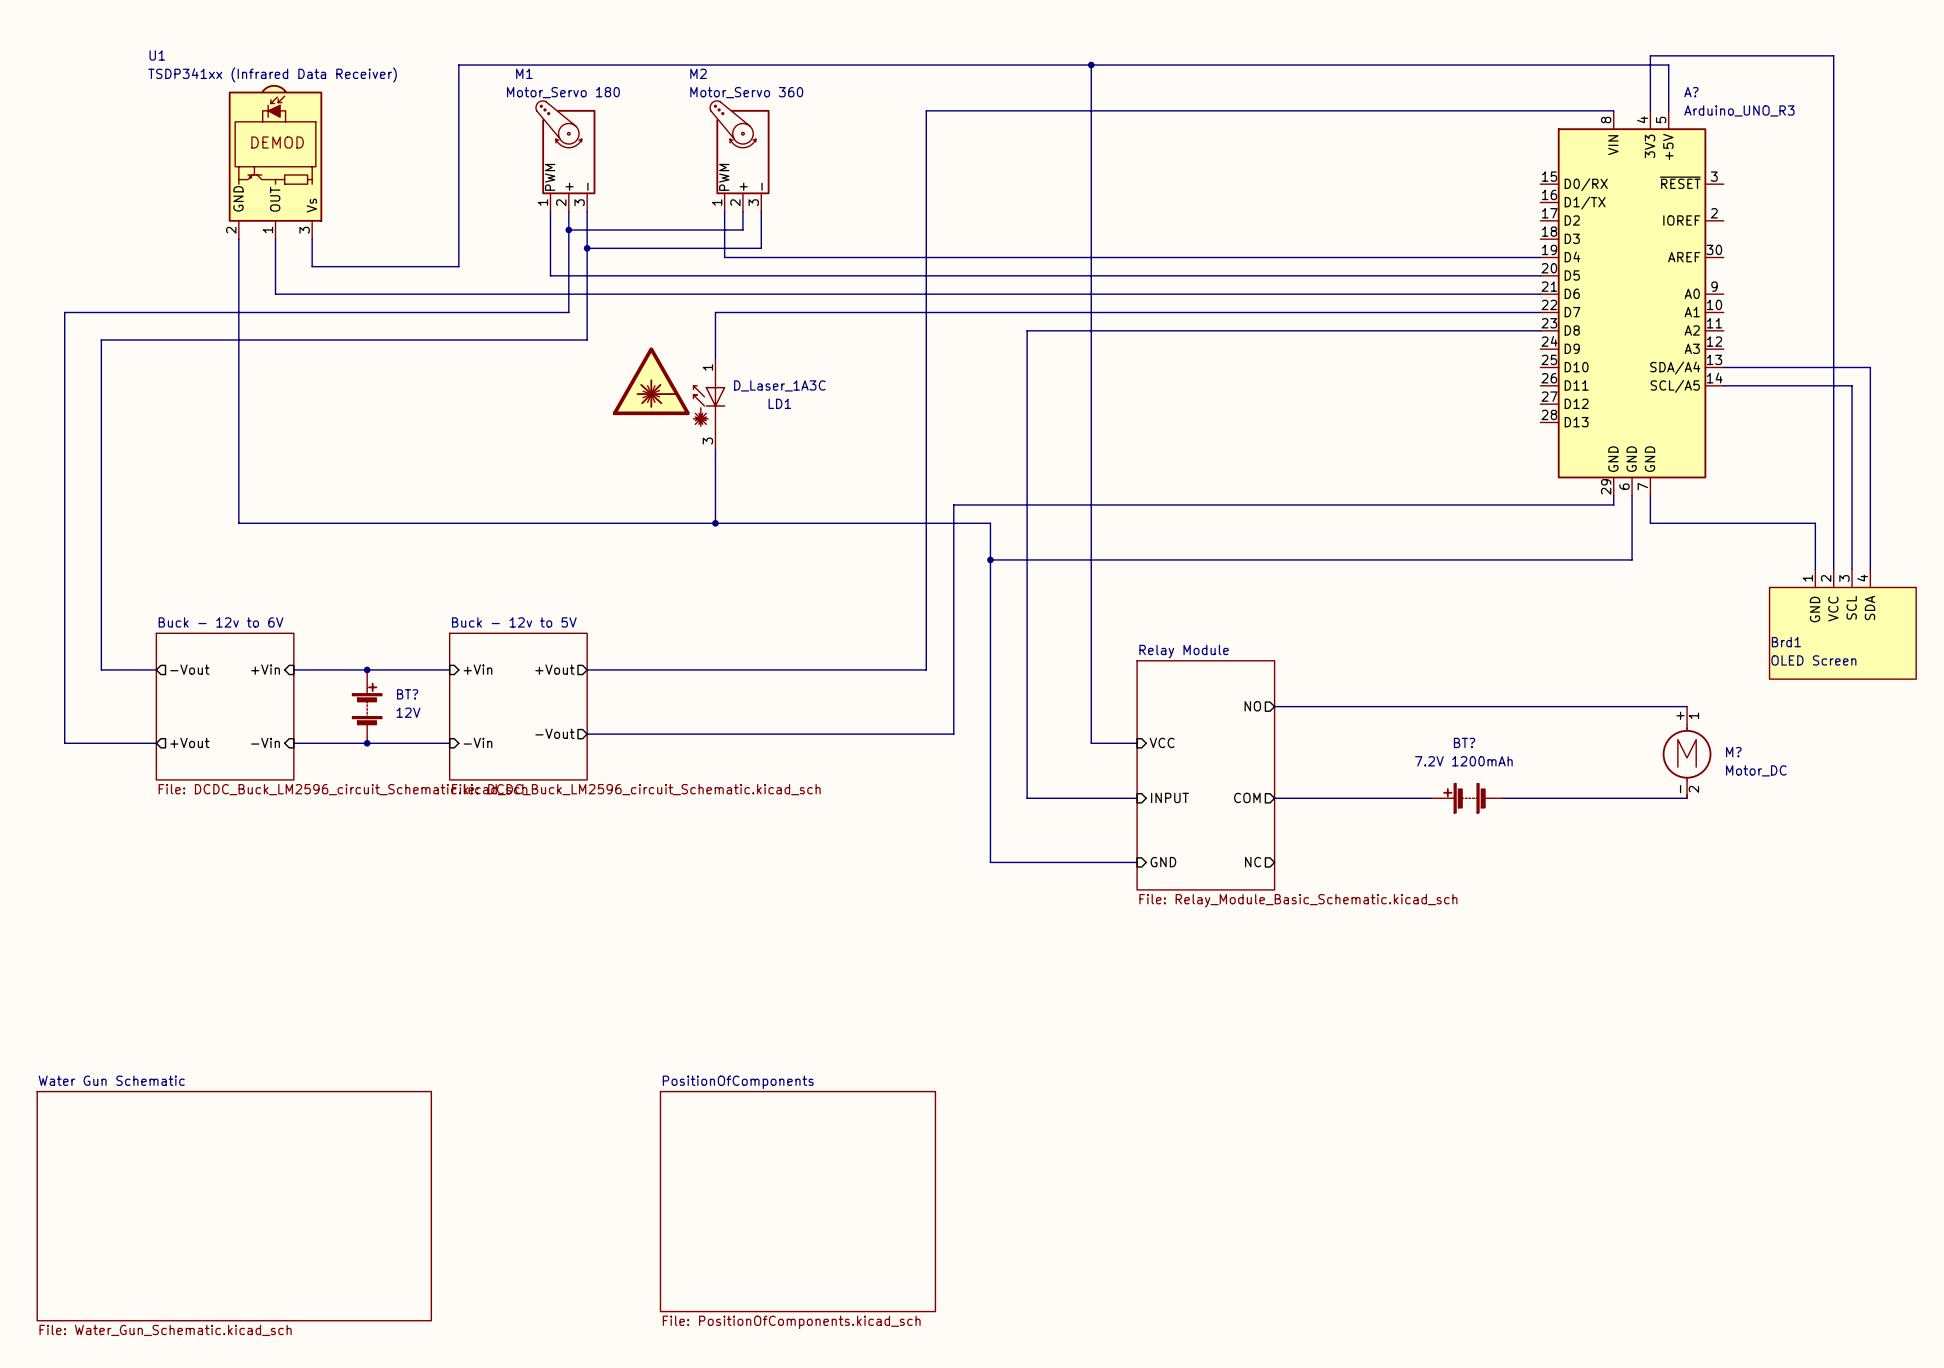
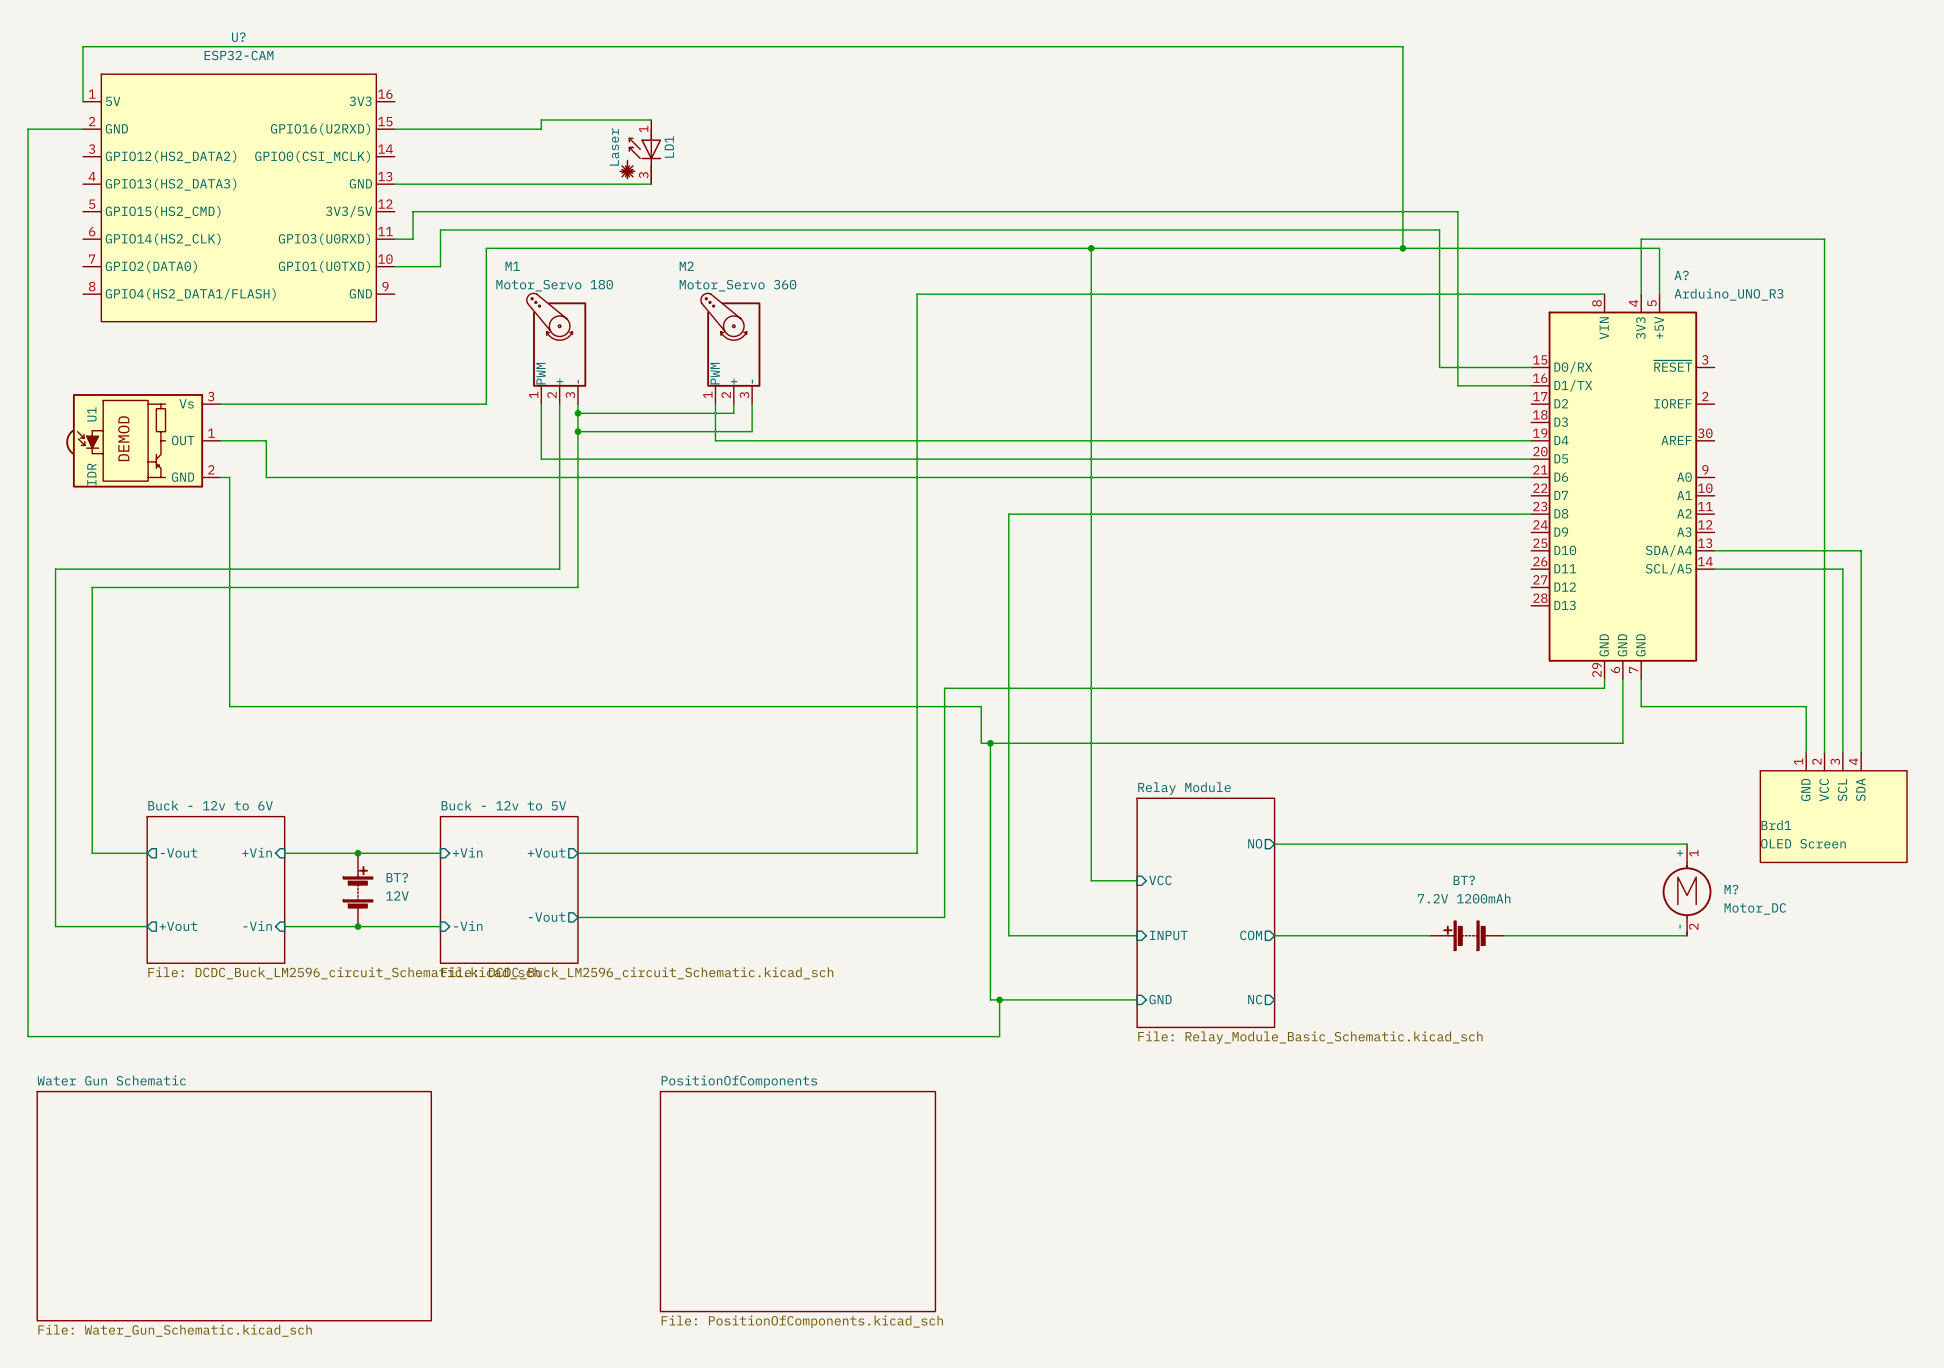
U1 name position: U1 (157, 55) -> U1 (91, 414)
wire: (1091, 65) (1091, 248) -> none
junction: (1091, 65) -> none
U1 value: TSDP341xx (Infrared Data Receiver) (272, 74) -> IDR (91, 474)
wire: none -> (83, 101) (83, 46) (1402, 46) (1402, 248)
wire: (1613, 110) (926, 110) (926, 669) (587, 669) -> none
wire: (1650, 110) (1650, 55) (1833, 55) (1833, 569) -> none
wire: (1668, 110) (1668, 65) (458, 65) (458, 266) (440, 266) -> (568, 230) (440, 230) (440, 266)
wire: none -> (651, 120) (541, 120) (541, 129) (394, 129)
wire: none -> (83, 129) (28, 129) (28, 1036) (999, 1036) (999, 999)
U1 rotation: 0° (275, 153) -> 90° counterclockwise (134, 440)
M1 position: (565, 156) -> (556, 348)
M2 position: (739, 156) -> (730, 348)
U1 position: (275, 162) -> (143, 440)
wire: none -> (394, 184) (651, 184)
U?: none -> ESP32-CAM (238, 197)
wire: (550, 211) (550, 275) (1540, 275) -> none
wire: (568, 211) (568, 312) (64, 312) (64, 743) (156, 743) -> none
wire: (587, 211) (587, 339) (101, 339) (101, 669) (156, 669) -> none
wire: (724, 211) (724, 257) (1540, 257) -> none
wire: (742, 211) (742, 230) -> (1531, 367) (1439, 367) (1439, 230) (742, 230)
wire: (761, 211) (761, 248) -> (1659, 294) (1659, 248) (761, 248)
junction: (568, 230) -> none
wire: (238, 239) (238, 523) (990, 523) (990, 743) -> none
wire: (275, 239) (275, 294) (917, 294) -> (577, 853) (917, 853) (917, 294)
wire: none -> (394, 239) (412, 239) (412, 211) (1457, 211) (1457, 385) (1531, 385)
wire: none -> (587, 248) (486, 248) (486, 404) (220, 404)
junction: (587, 248) -> none
junction: none -> (1091, 248)
junction: none -> (1402, 248)
wire: none -> (1641, 294) (1641, 239) (1824, 239) (1824, 752)
A?: Arduino_UNO_R3 (1632, 303) -> none
wire: (1540, 312) (715, 312) (715, 358) -> none
wire: (1540, 330) (1027, 330) (1027, 798) (1137, 798) -> none
LD1 symbol: [693, 358, 726, 450] -> [620, 120, 662, 185]
wire: (1723, 367) (1870, 367) (1870, 569) -> none
power symbol: (651, 381) -> none
LD1 value: D_Laser_1A3C (779, 385) -> Laser (614, 146)
wire: (1723, 385) (1852, 385) (1852, 569) -> none
LD1 name position: LD1 (779, 403) -> LD1 (669, 147)
wire: none -> (541, 404) (541, 459) (1531, 459)
wire: none -> (559, 404) (559, 569) (55, 569) (55, 926) (147, 926)
wire: none -> (577, 404) (577, 587) (92, 587) (92, 853) (147, 853)
wire: none -> (715, 404) (715, 440) (1531, 440)
wire: none -> (733, 404) (733, 413) (577, 413)
wire: none -> (752, 404) (752, 431) (577, 431)
junction: none -> (577, 413)
junction: none -> (577, 431)
wire: none -> (220, 440) (266, 440) (266, 477) (1531, 477)
wire: (715, 449) (715, 523) -> none
wire: none -> (220, 477) (229, 477) (229, 706) (981, 706) (981, 743) (1091, 743) (1091, 880) (1137, 880)
A?: none -> Arduino_UNO_R3 (1622, 486)
wire: (1613, 495) (1613, 504) (953, 504) (953, 734) (587, 734) -> none
wire: (1632, 495) (1632, 559) (990, 559) -> none
wire: (1650, 495) (1650, 523) (1815, 523) (1815, 569) -> none
wire: none -> (1531, 514) (1008, 514) (1008, 935) (1137, 935)
junction: (715, 523) -> none
wire: none -> (1714, 550) (1861, 550) (1861, 752)
junction: (990, 559) -> none
wire: none -> (1714, 569) (1842, 569) (1842, 752)
Brd1 position: (1842, 624) -> (1833, 807)
sheet pin: -Vout (189, 669) -> none
sheet pin: +Vin (265, 669) -> none
wire: (293, 669) (449, 669) -> none
junction: (367, 669) -> none
sheet pin: +Vin (477, 669) -> none
sheet pin: +Vout (554, 669) -> none
wire: none -> (1604, 679) (1604, 688) (944, 688) (944, 917) (577, 917)
wire: none -> (1622, 679) (1622, 743) (1137, 743)
sheet Buck - 12v to 6V position: (225, 706) -> (215, 889)
BT?: 12V (367, 706) -> none
sheet Buck - 12v to 5V position: (518, 706) -> (509, 889)
sheet pin position: NO (1252, 706) -> NO (1255, 843)
wire: (1274, 706) (1641, 706) -> (1641, 679) (1641, 706)
wire: none -> (1687, 706) (1806, 706) (1806, 752)
sheet pin: -Vout (554, 733) -> none
sheet pin: +Vout (189, 742) -> none
sheet pin: -Vin (265, 742) -> none
sheet pin: -Vin (477, 742) -> none
sheet pin position: VCC (1162, 742) -> VCC (1160, 880)
wire: (293, 743) (449, 743) -> (284, 853) (440, 853)
junction: (367, 743) -> none
junction: none -> (990, 743)
M? position: (1687, 752) -> (1687, 889)
sheet Relay Module position: (1205, 775) -> (1205, 912)
sheet pin position: INPUT (1169, 797) -> INPUT (1168, 935)
sheet pin position: COM (1247, 797) -> COM (1251, 935)
wire: (1274, 798) (1430, 798) -> (1274, 935) (1430, 935)
BT? position: (1467, 798) -> (1467, 935)
wire: (1503, 798) (1687, 798) -> (1503, 935) (1687, 935)
wire: none -> (1274, 844) (1687, 844)
sheet pin: none -> -Vout (179, 853)
sheet pin: none -> +Vin (257, 852)
sheet pin: none -> +Vin (467, 852)
sheet pin: none -> +Vout (546, 853)
junction: none -> (358, 853)
wire: (990, 862) (1137, 862) -> (990, 862) (990, 999) (1137, 999)
sheet pin position: GND (1163, 862) -> GND (1160, 999)
sheet pin position: NC (1253, 862) -> NC (1255, 999)
BT?: none -> 12V (358, 889)
sheet pin: none -> -Vout (547, 917)
sheet pin: none -> +Vout (178, 926)
sheet pin: none -> -Vin (257, 925)
wire: none -> (284, 926) (440, 926)
junction: none -> (358, 926)
sheet pin: none -> -Vin (468, 925)
junction: none -> (999, 999)

